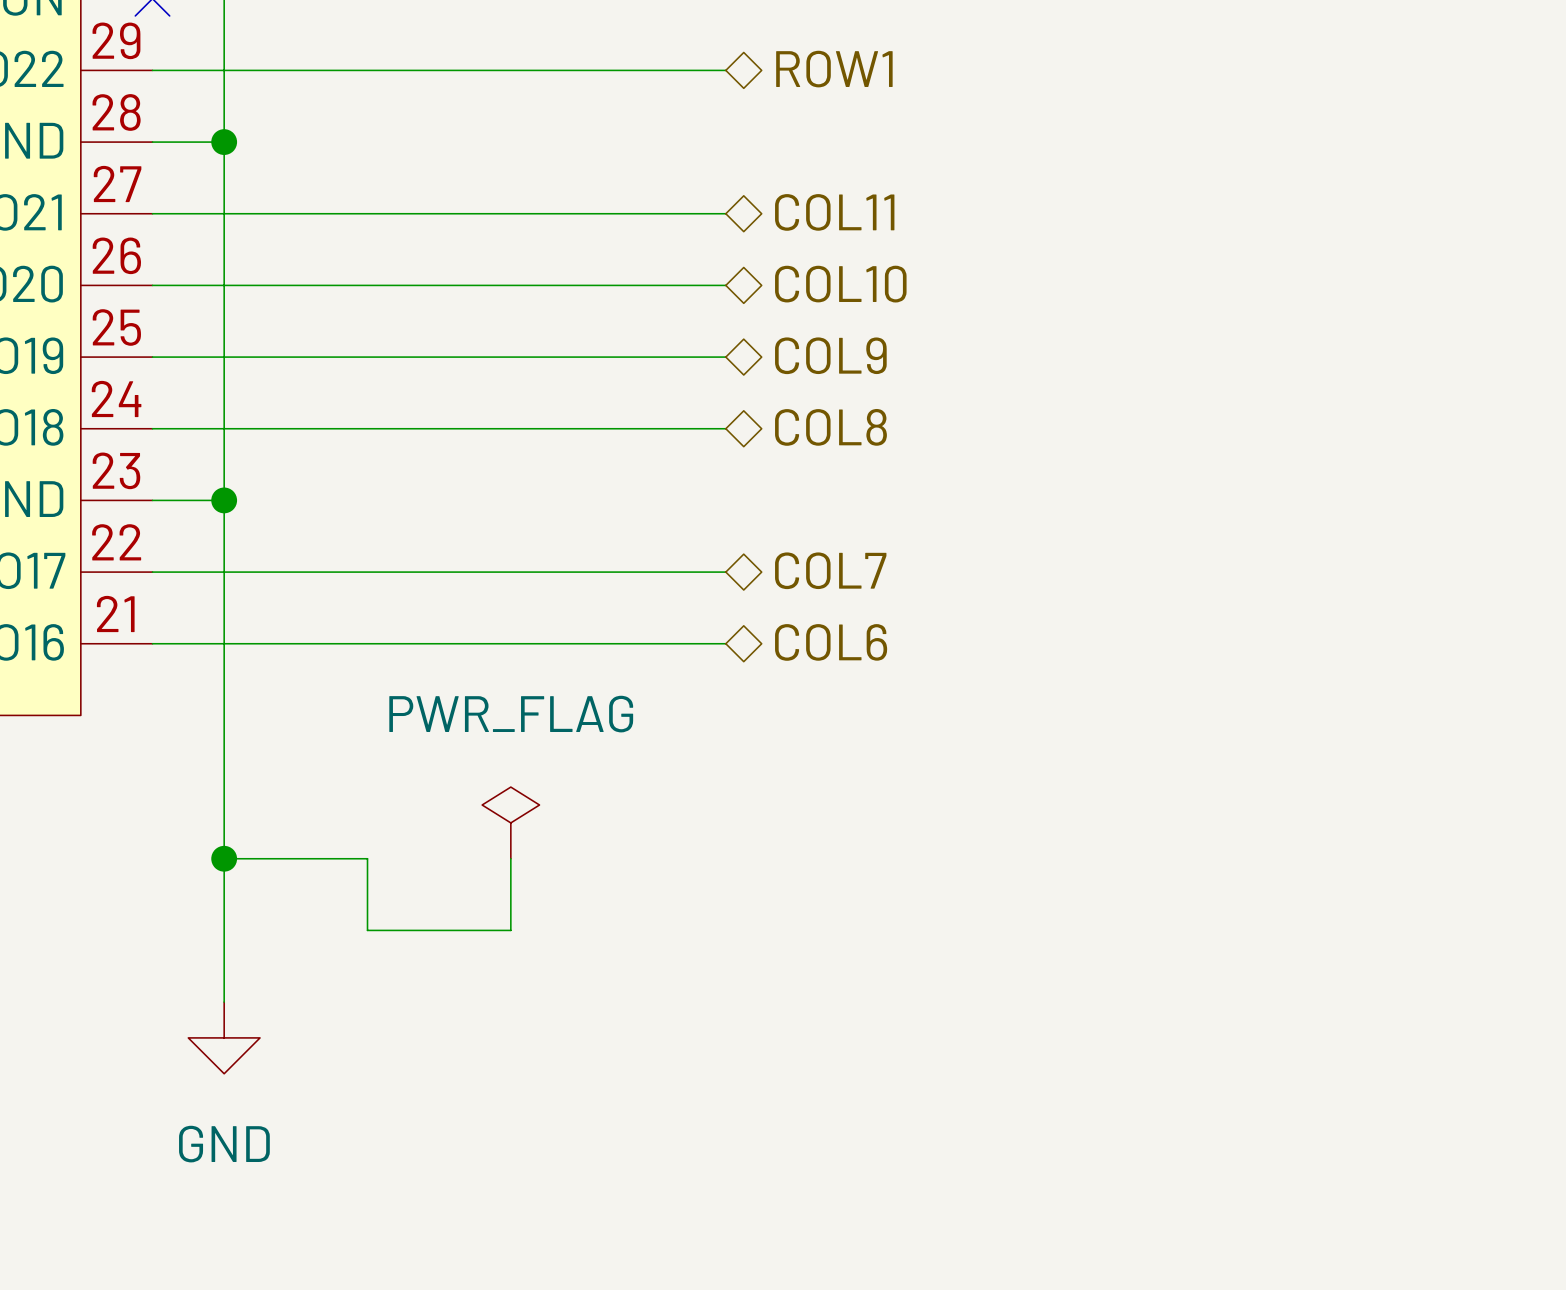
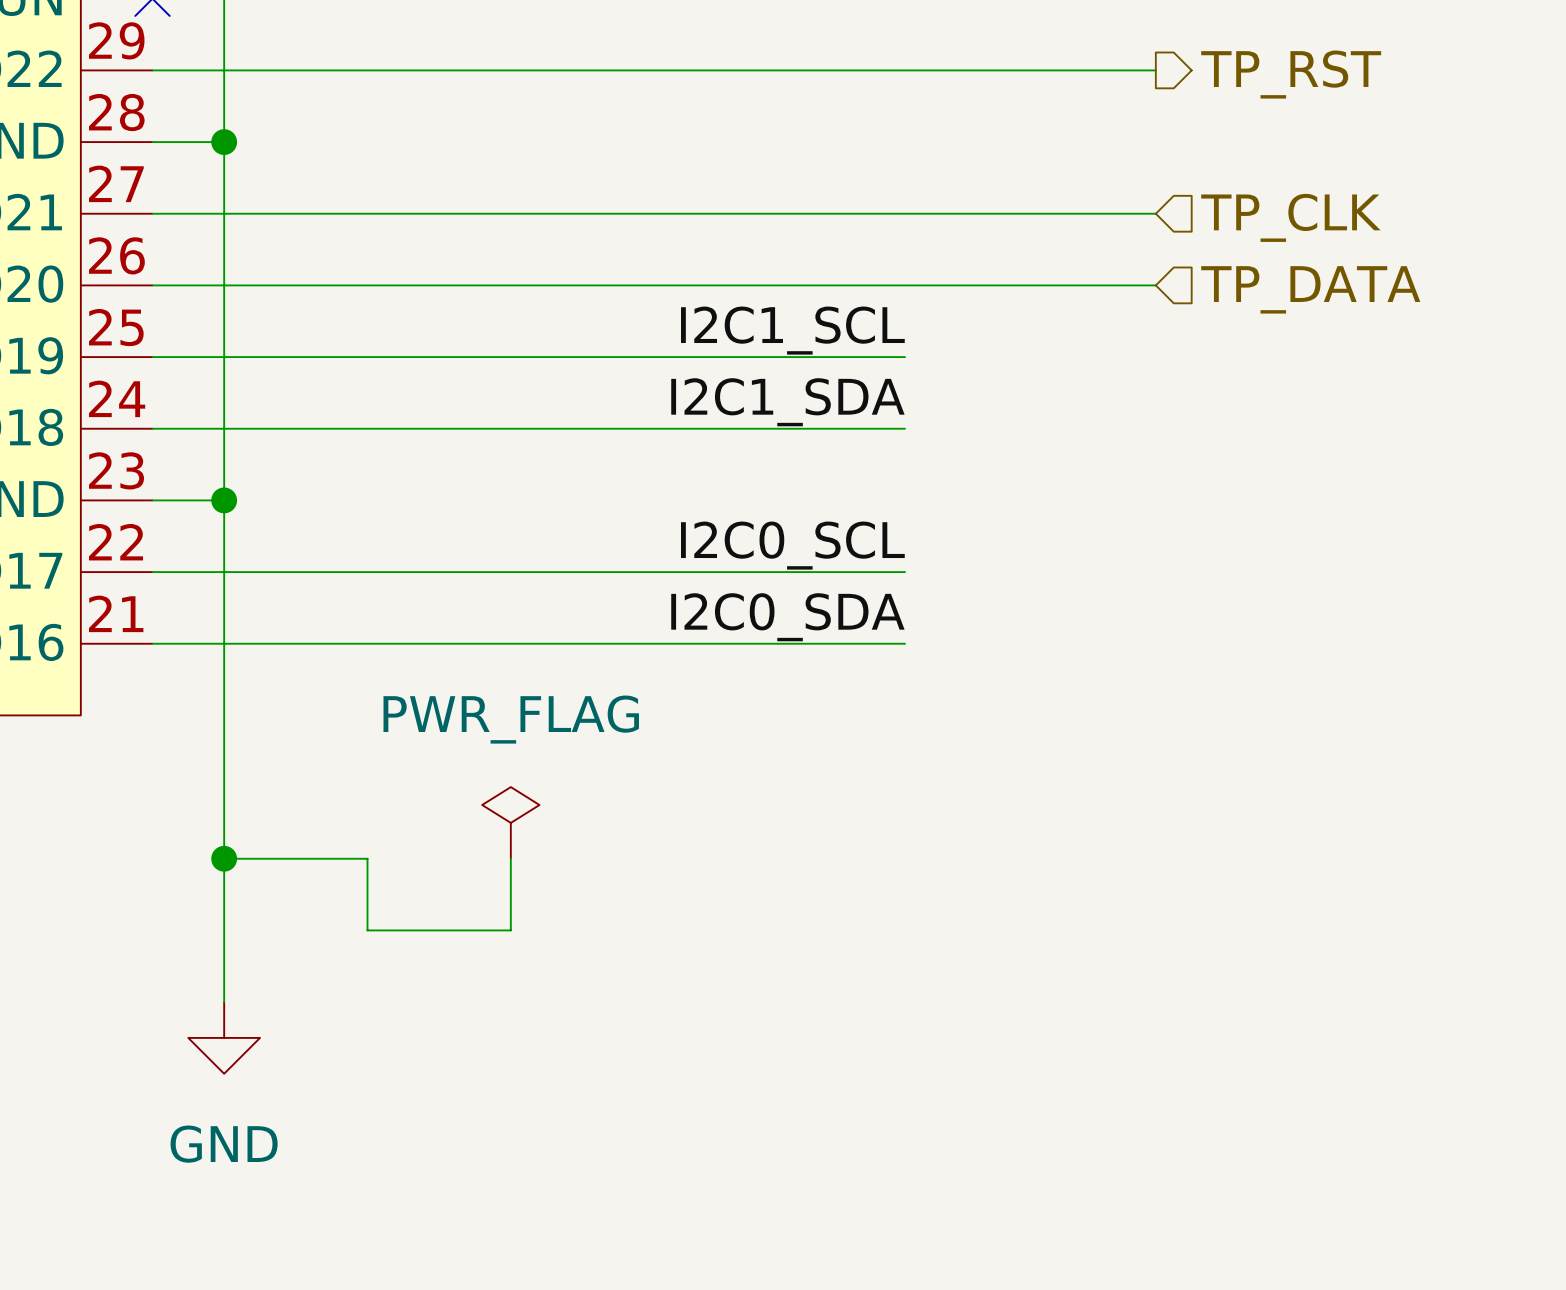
hierarchical label: ROW1 (834, 69) -> none
hierarchical label: none -> TP_RST (1291, 74)
wire: none -> (725, 70) (1155, 70)
hierarchical label: COL11 (834, 212) -> none
hierarchical label: none -> TP_CLK (1290, 217)
wire: none -> (725, 213) (1155, 213)
hierarchical label: COL10 (840, 284) -> none
hierarchical label: none -> TP_DATA (1310, 289)
wire: none -> (725, 285) (1155, 285)
label: none -> I2C1_SCL (792, 330)
hierarchical label: COL9 (830, 355) -> none
wire: none -> (725, 357) (905, 357)
label: none -> I2C1_SDA (787, 402)
hierarchical label: COL8 (830, 427) -> none
wire: none -> (725, 428) (905, 428)
label: none -> I2C0_SCL (792, 545)
hierarchical label: COL7 (830, 570) -> none
wire: none -> (725, 572) (905, 572)
label: none -> I2C0_SDA (787, 617)
hierarchical label: COL6 (831, 642) -> none
wire: none -> (725, 643) (905, 643)

